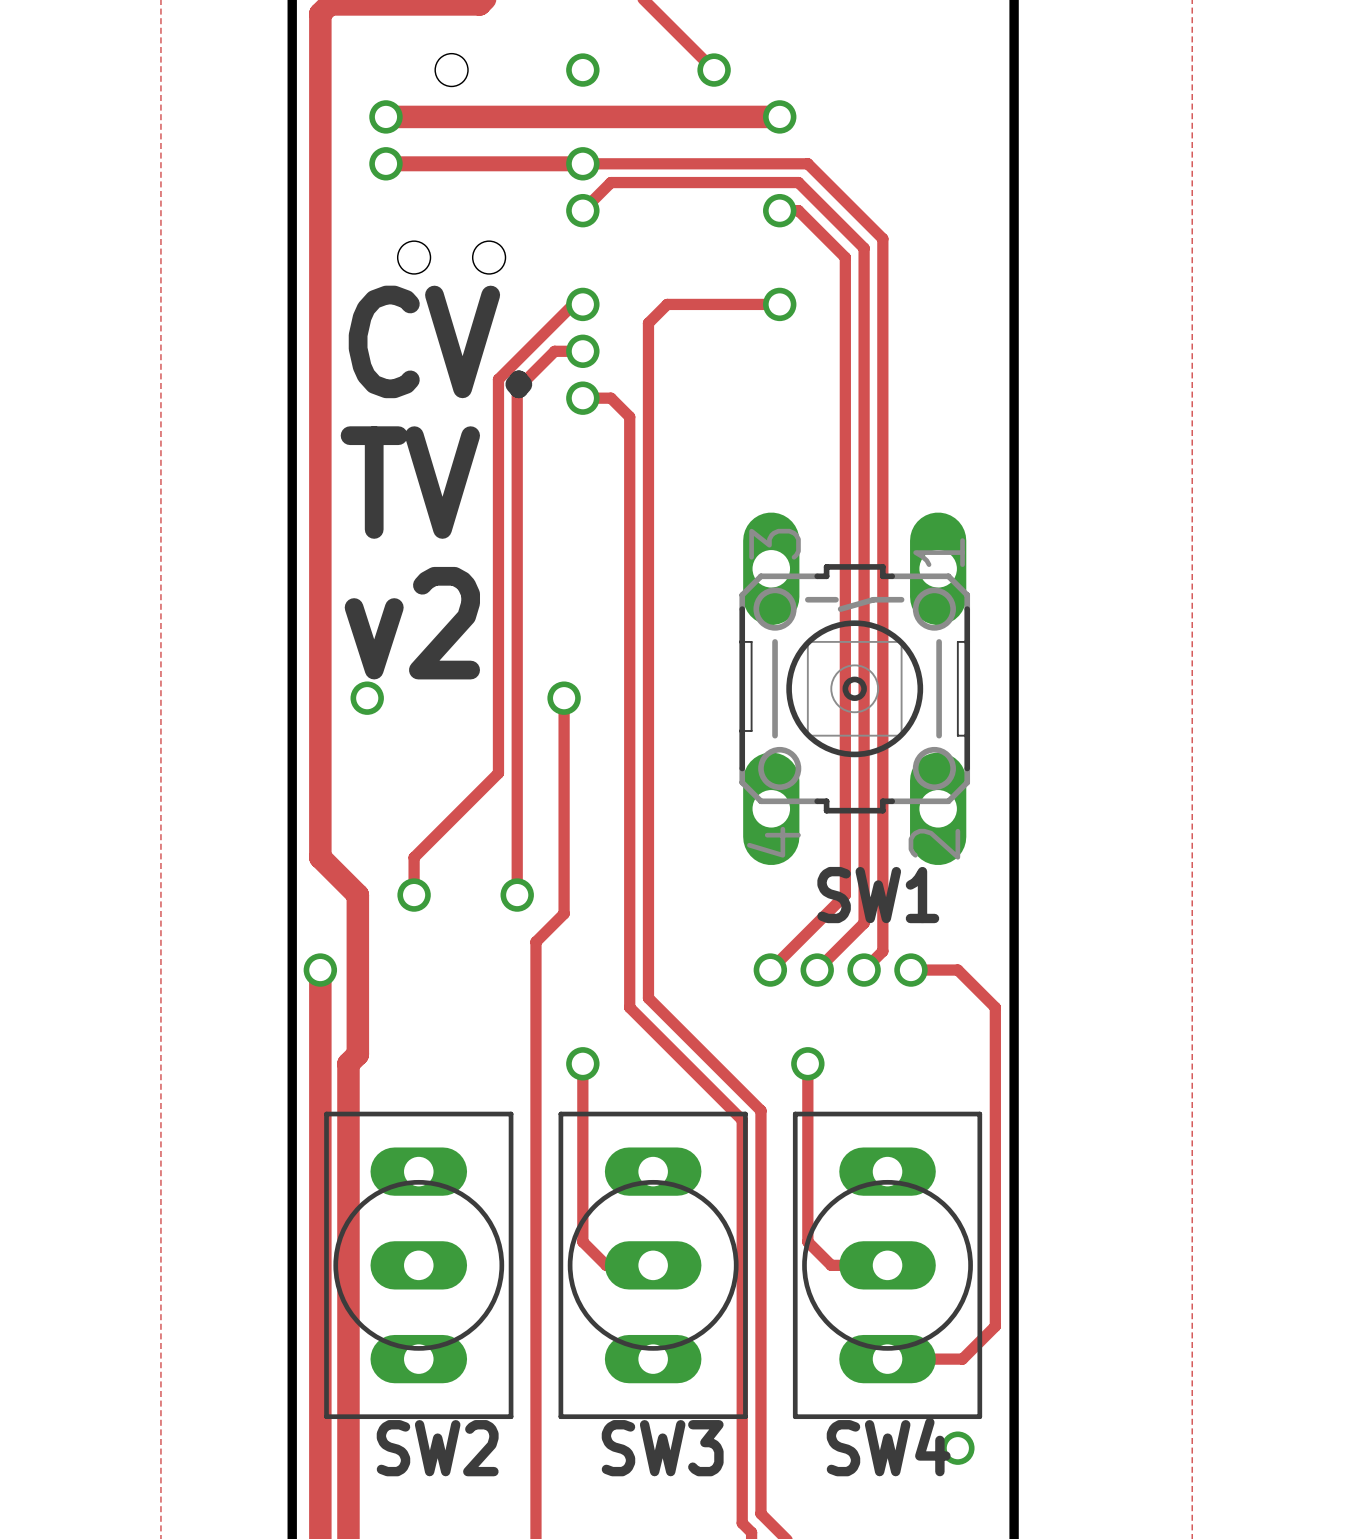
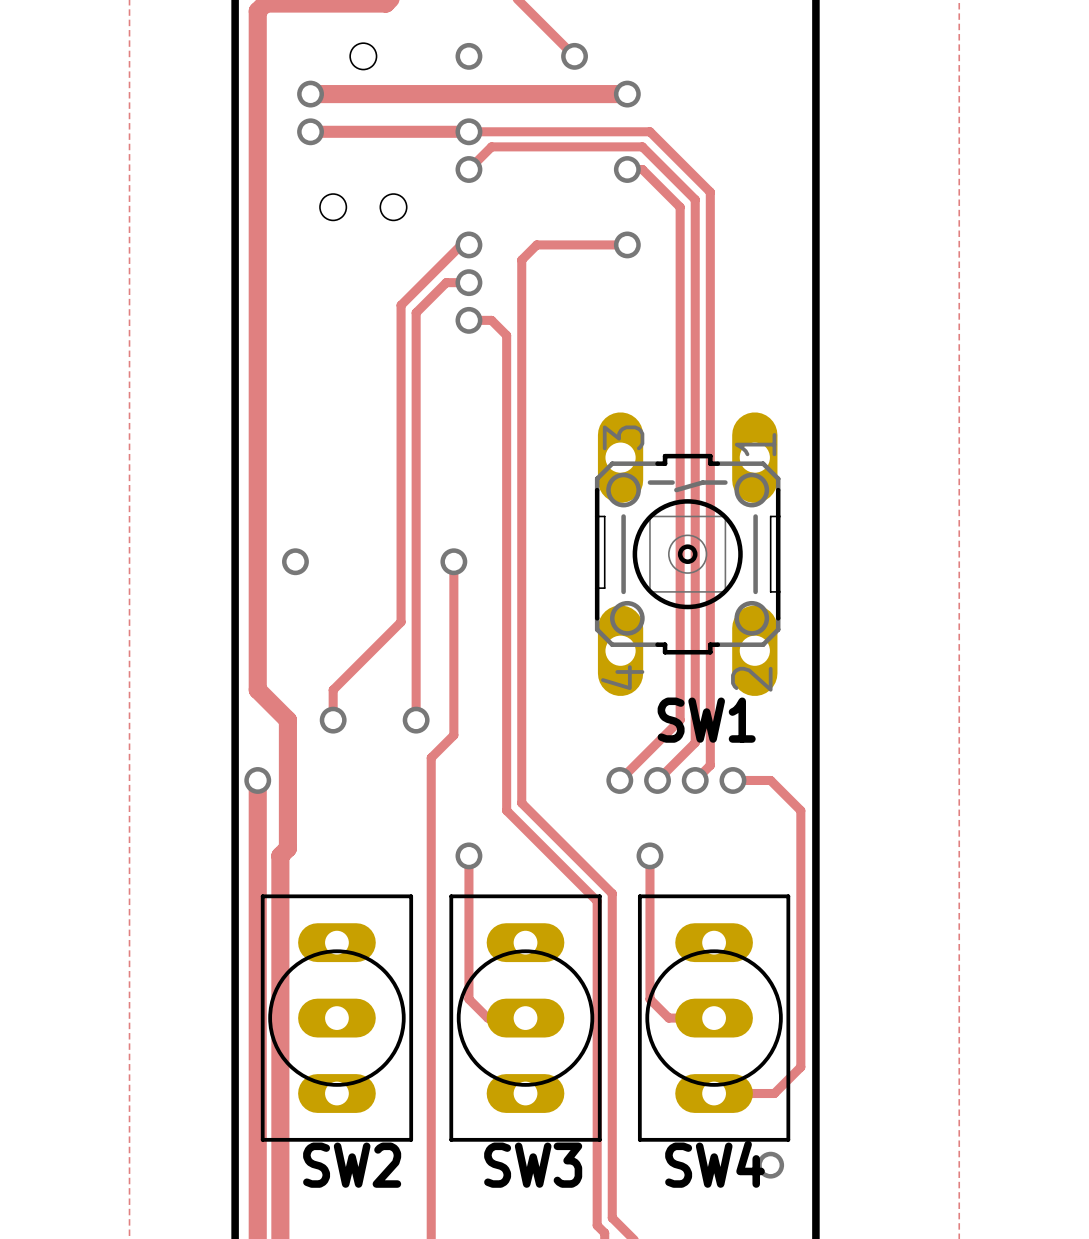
text: CV. (440, 341) -> none
text: TV (410, 482) -> none
text: v2 (412, 623) -> none

